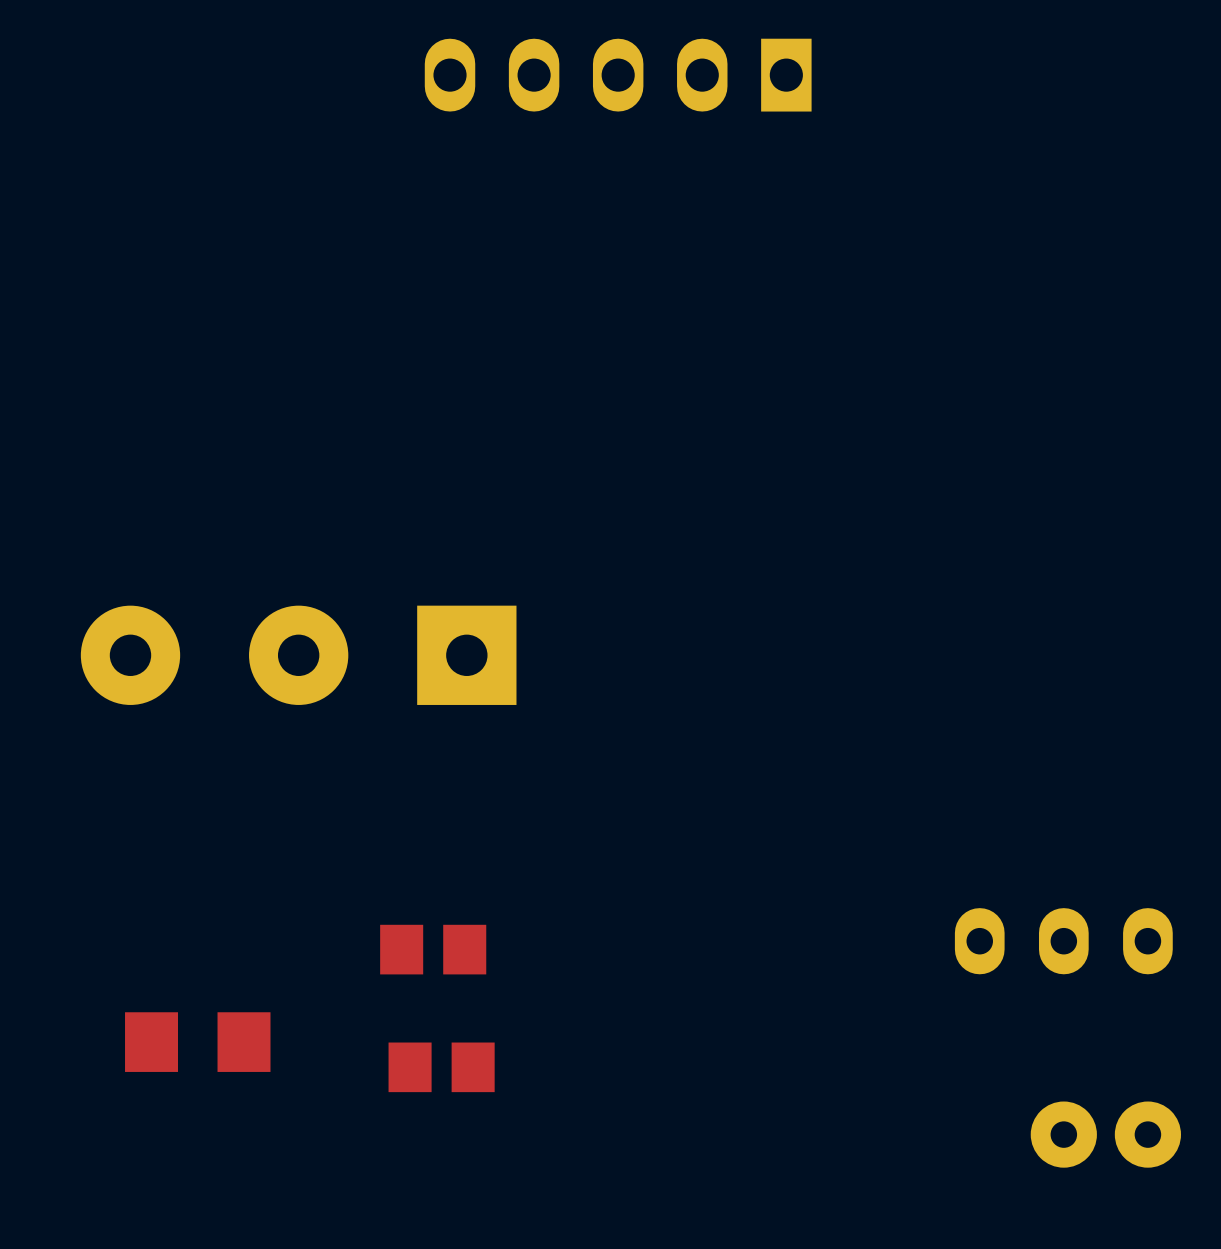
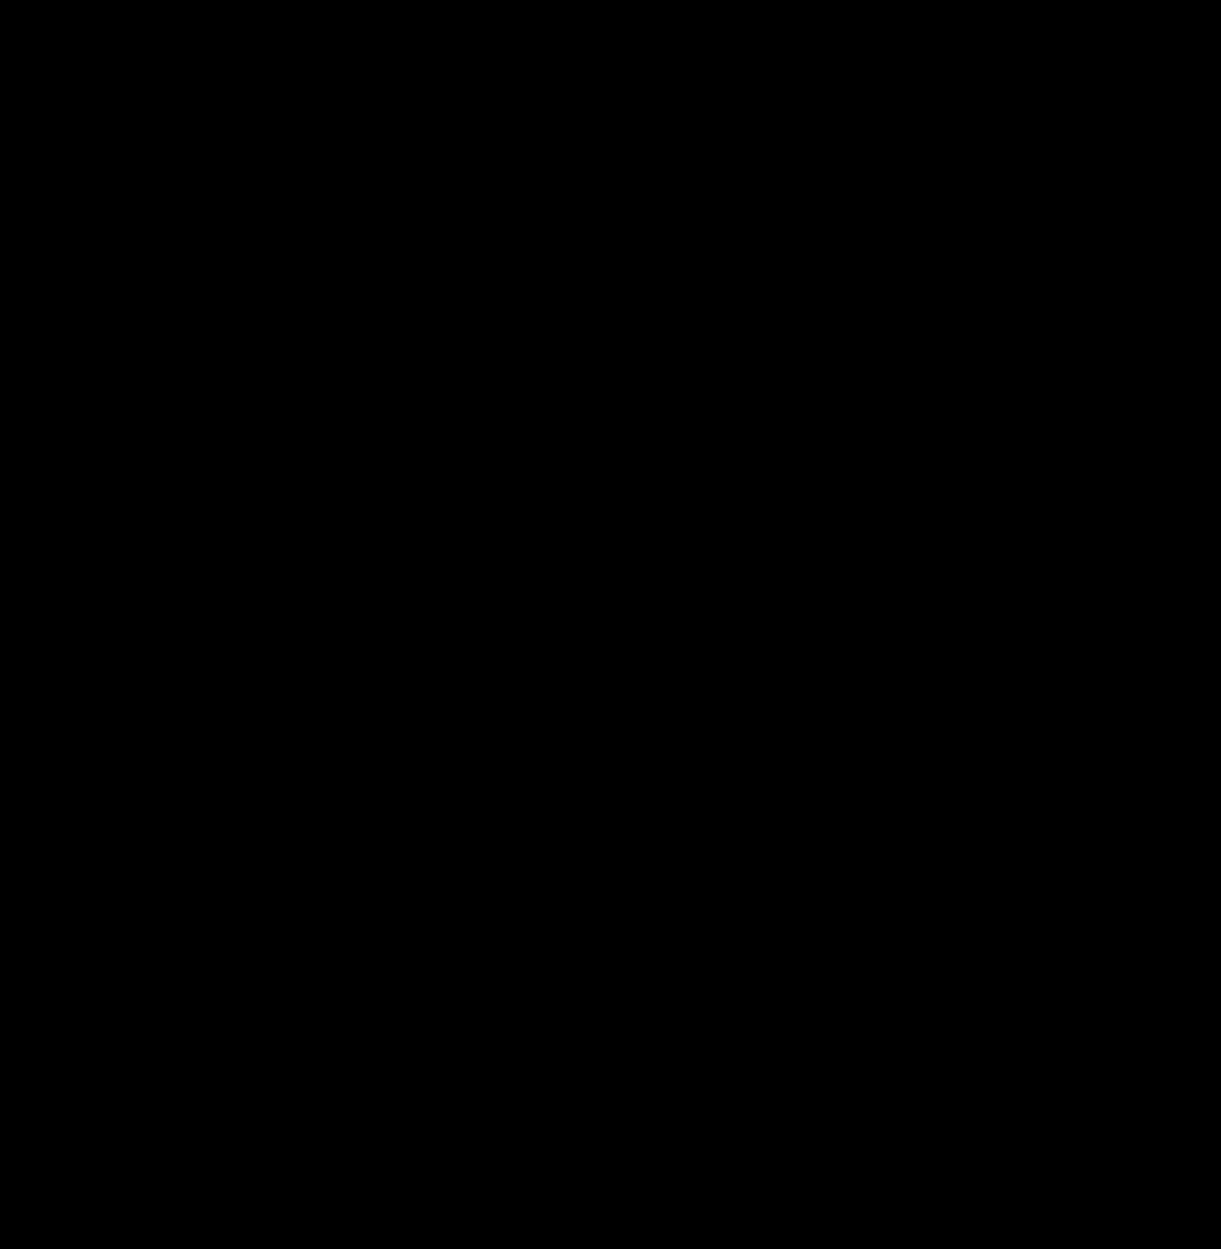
part: (618, 75) -> none
part: (298, 655) -> none
part: (1063, 941) -> none
part: (433, 949) -> none
part: (197, 1042) -> none
part: (441, 1067) -> none
part: (1105, 1134) -> none

